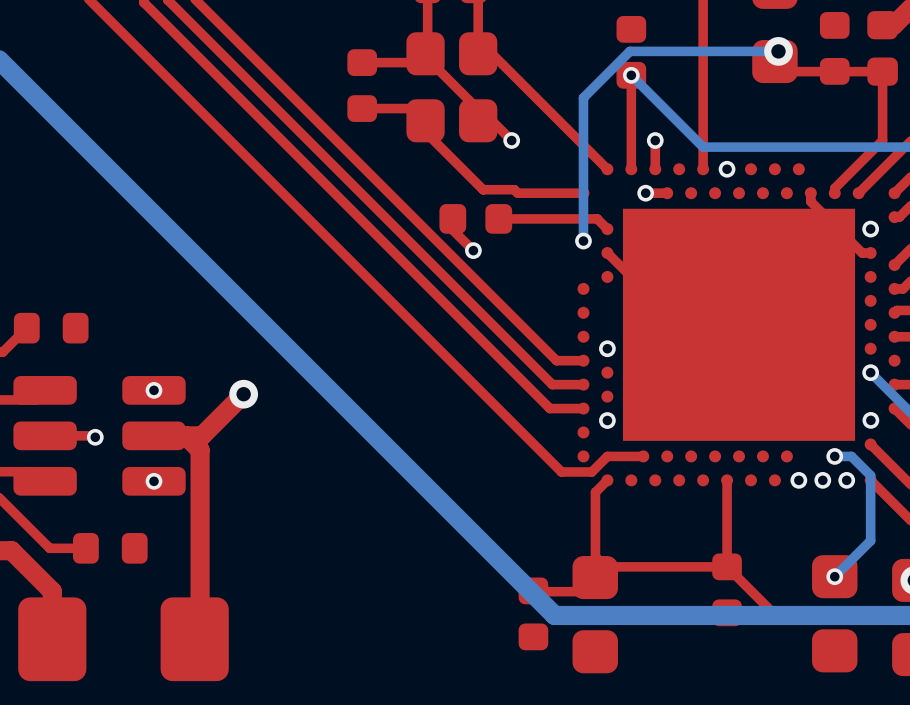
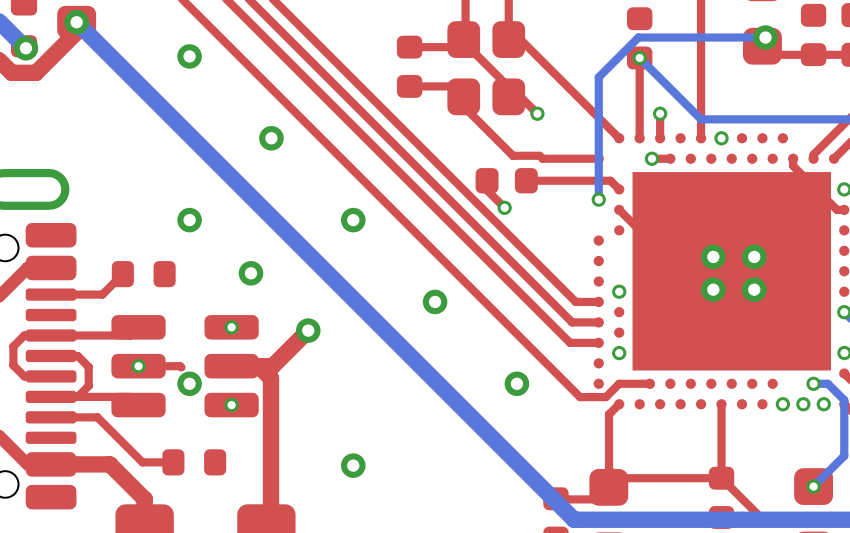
via: none -> (189, 56)
via: none -> (271, 138)
via: none -> (189, 220)
via: none -> (353, 220)
via: none -> (713, 256)
via: none -> (754, 256)
via: none -> (250, 273)
via: none -> (713, 289)
via: none -> (754, 289)
via: none -> (435, 301)
via position: (95, 437) -> (138, 366)
via: none -> (189, 383)
via: none -> (516, 383)
via: none -> (353, 465)

